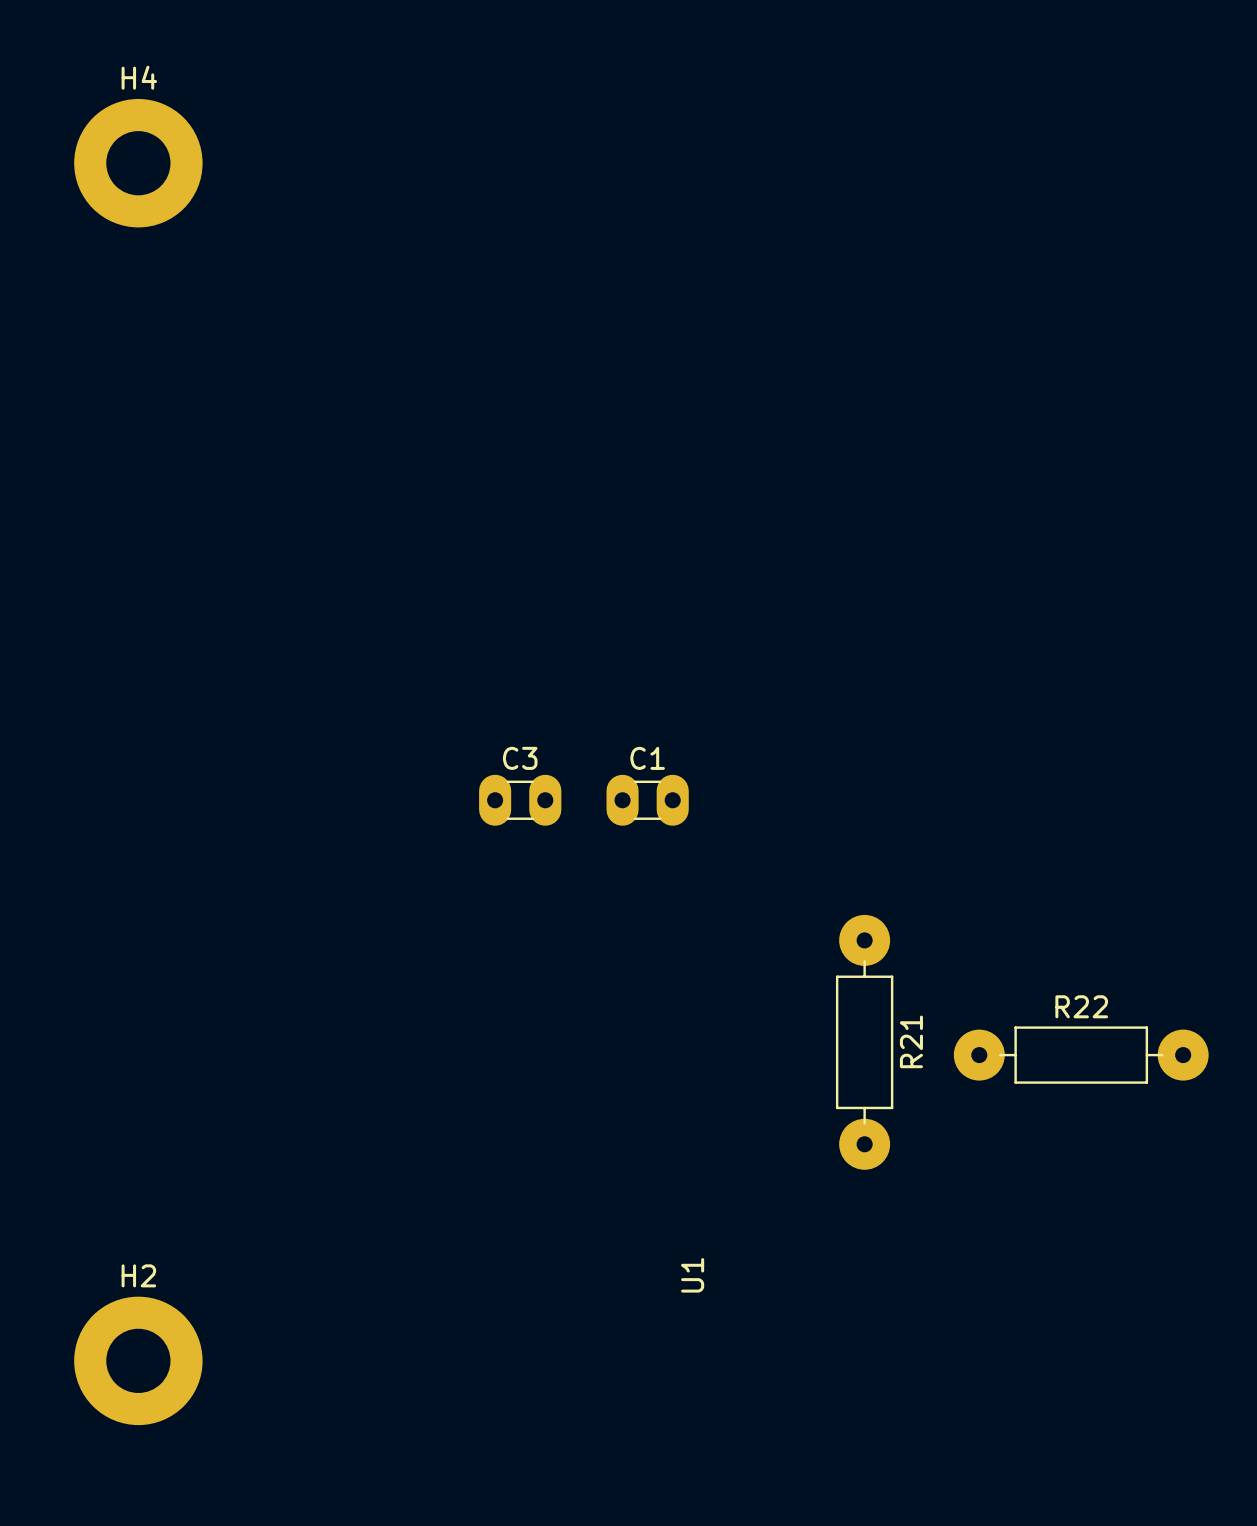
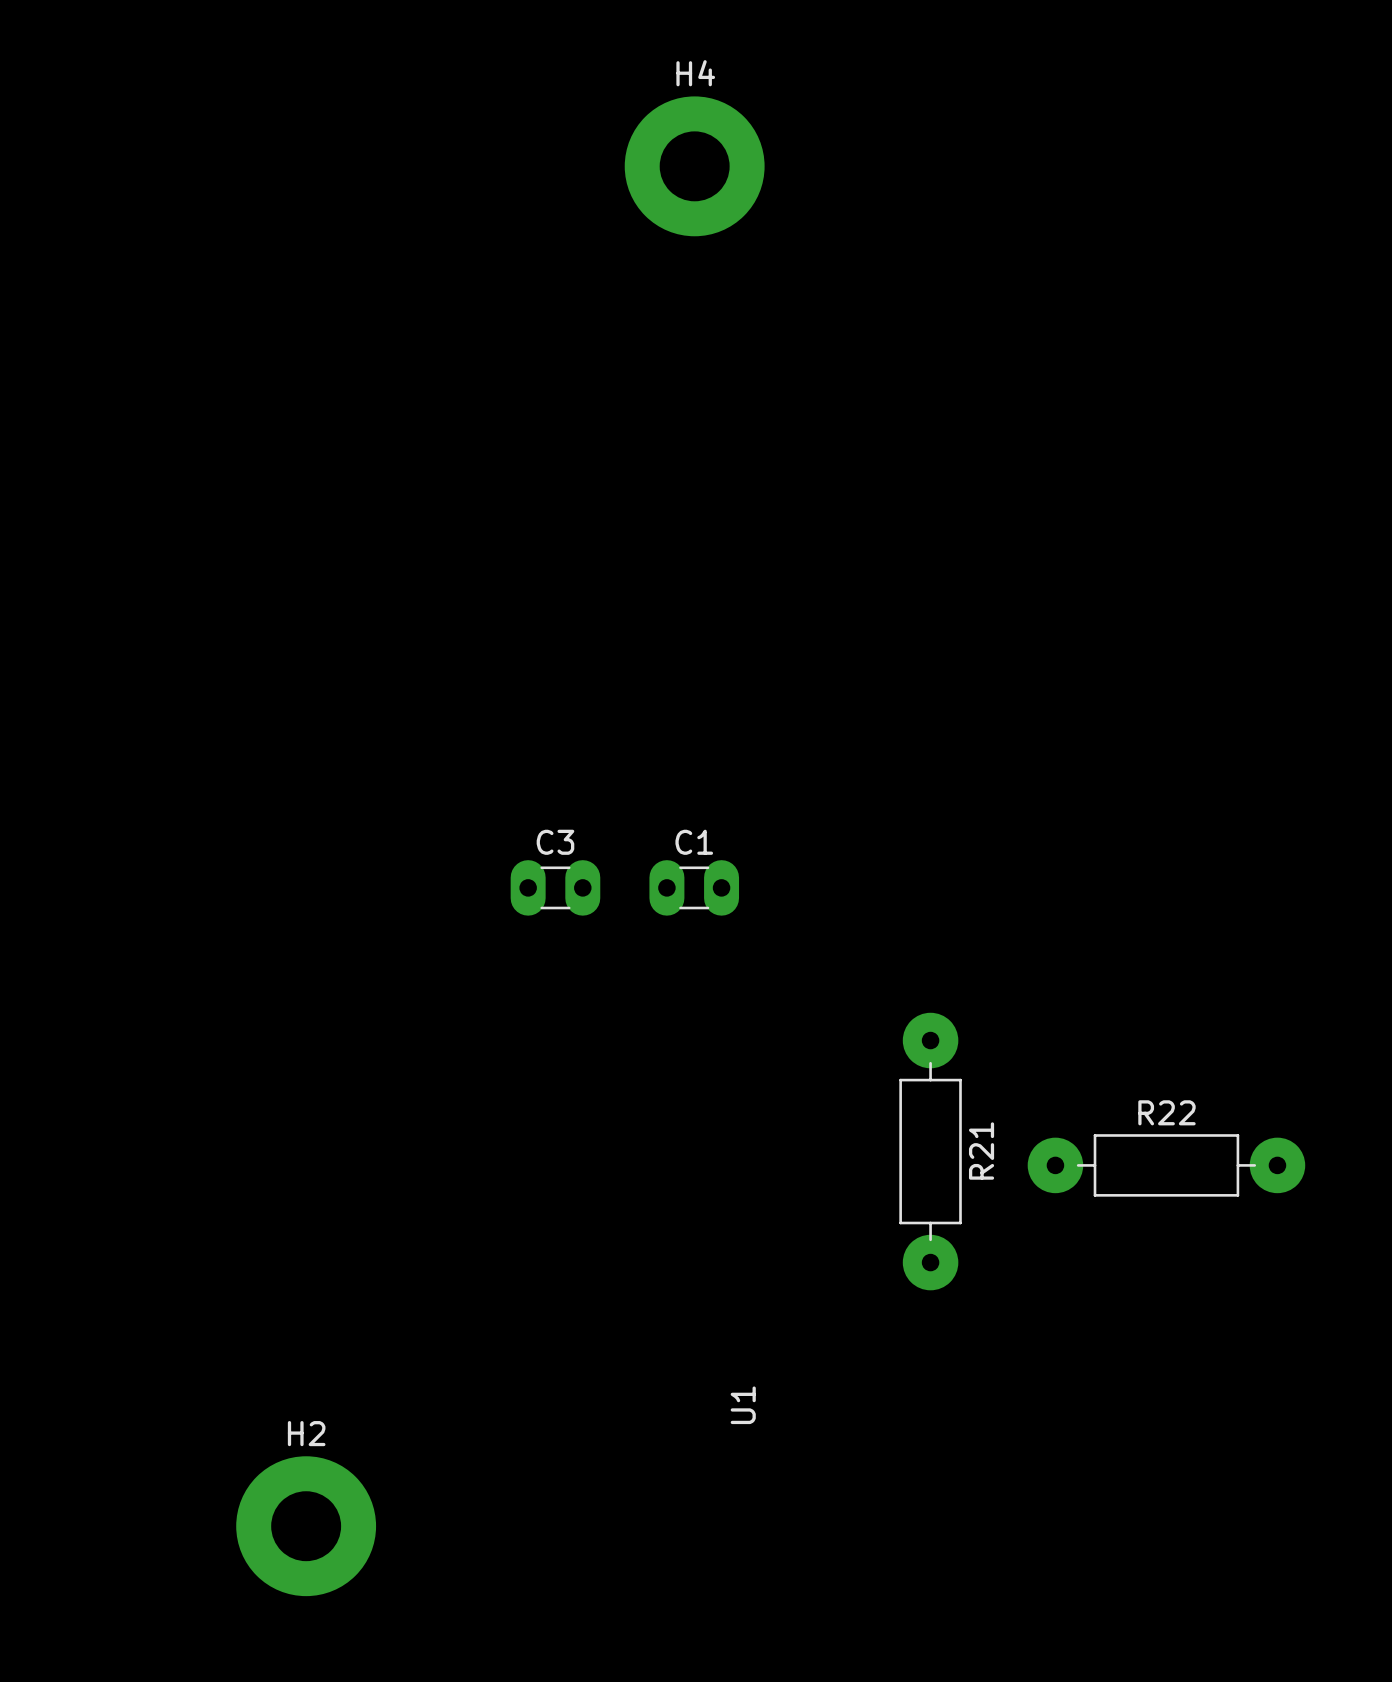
H4 position: (138, 163) -> (694, 166)
H2 position: (138, 1360) -> (306, 1526)

